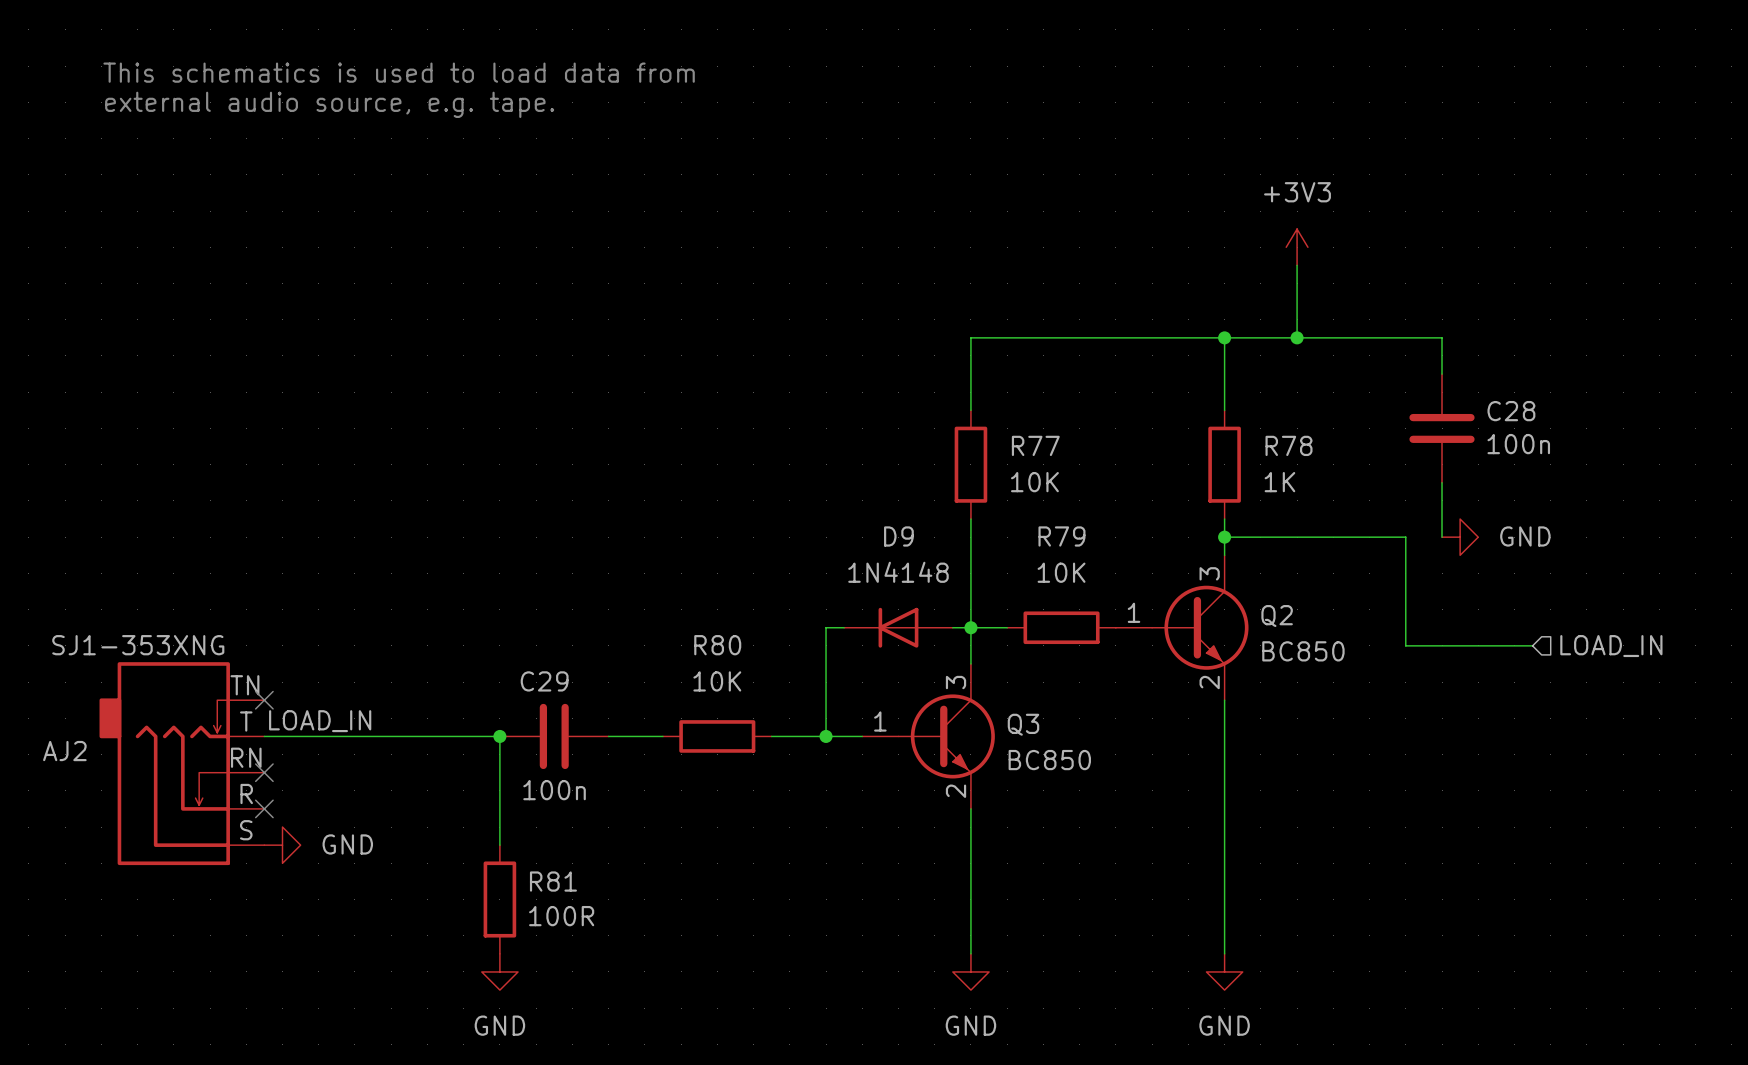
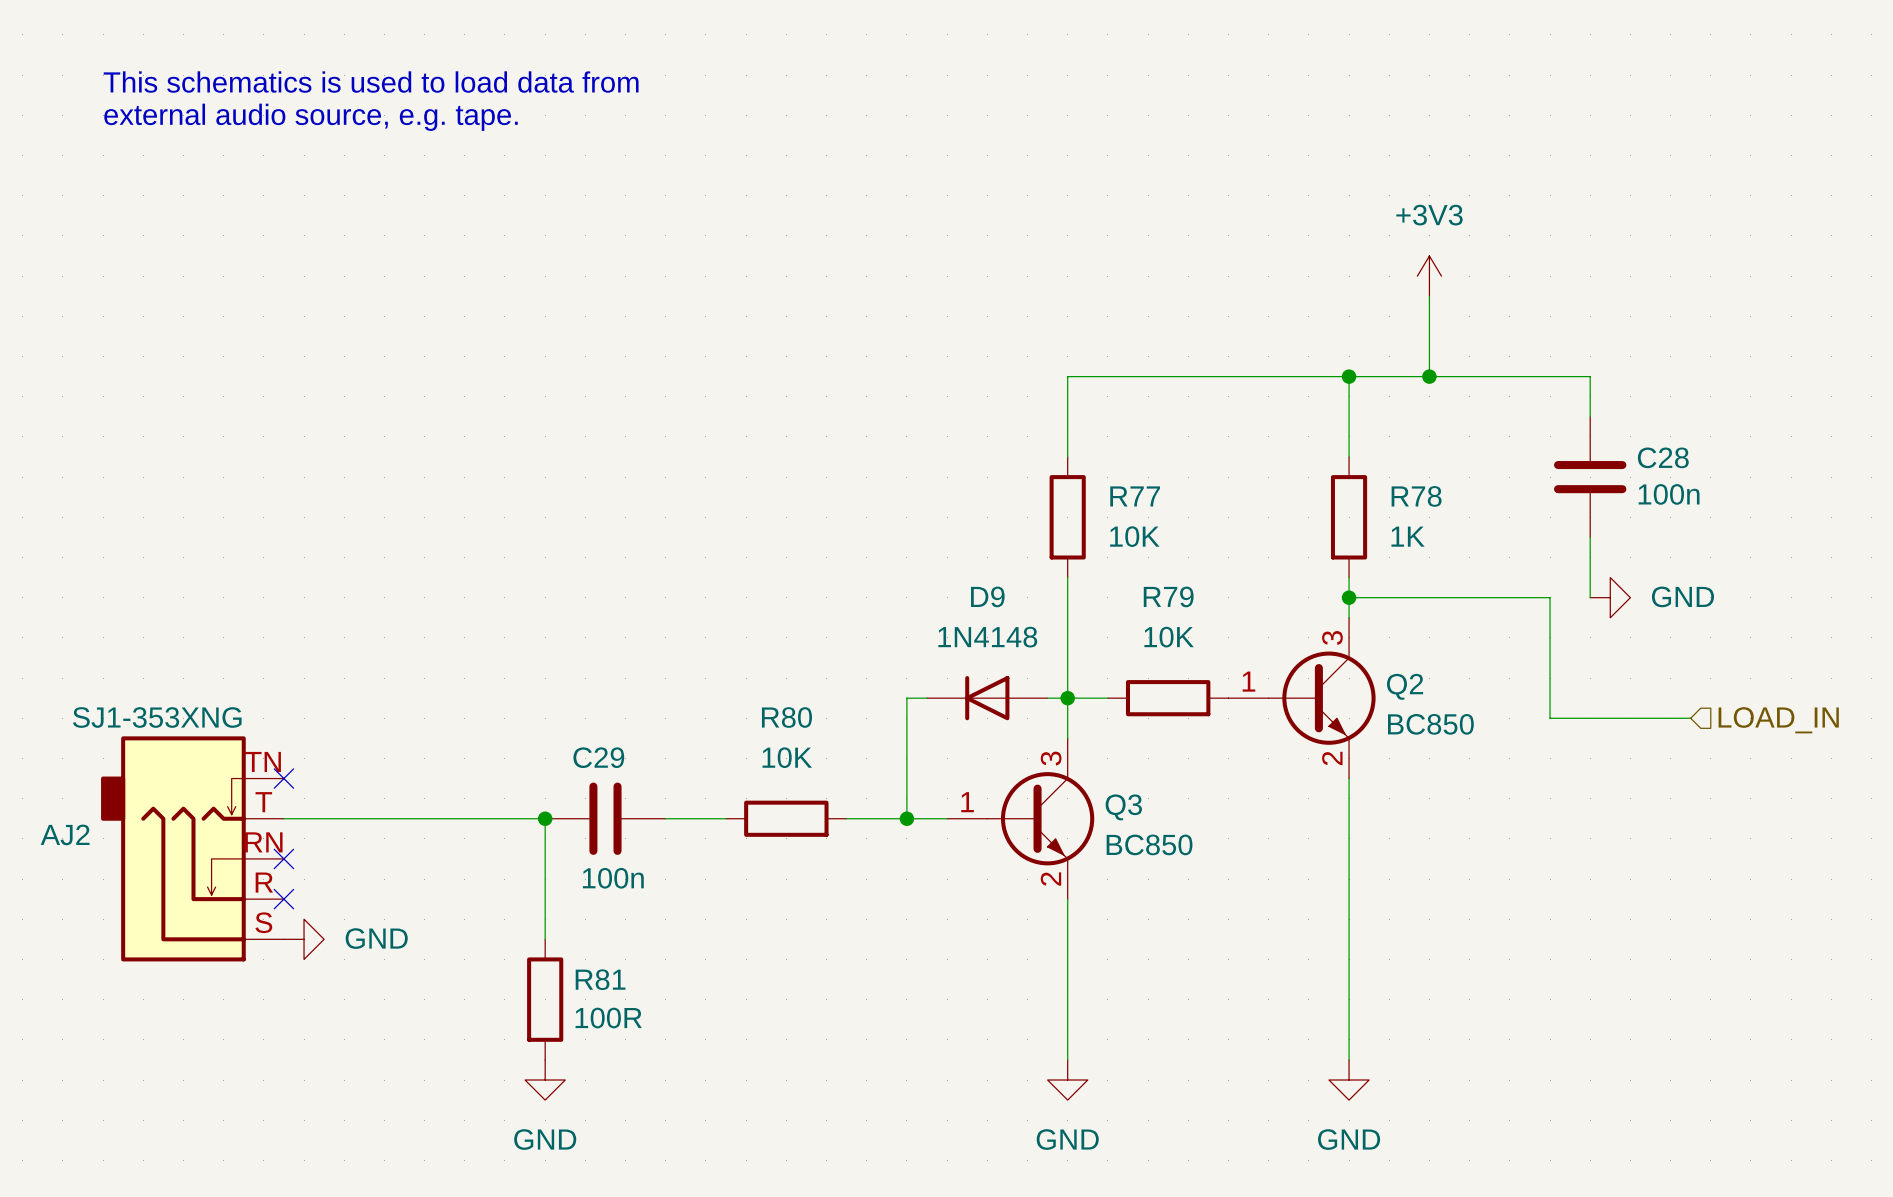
label: LOAD_IN (320, 721) -> none

